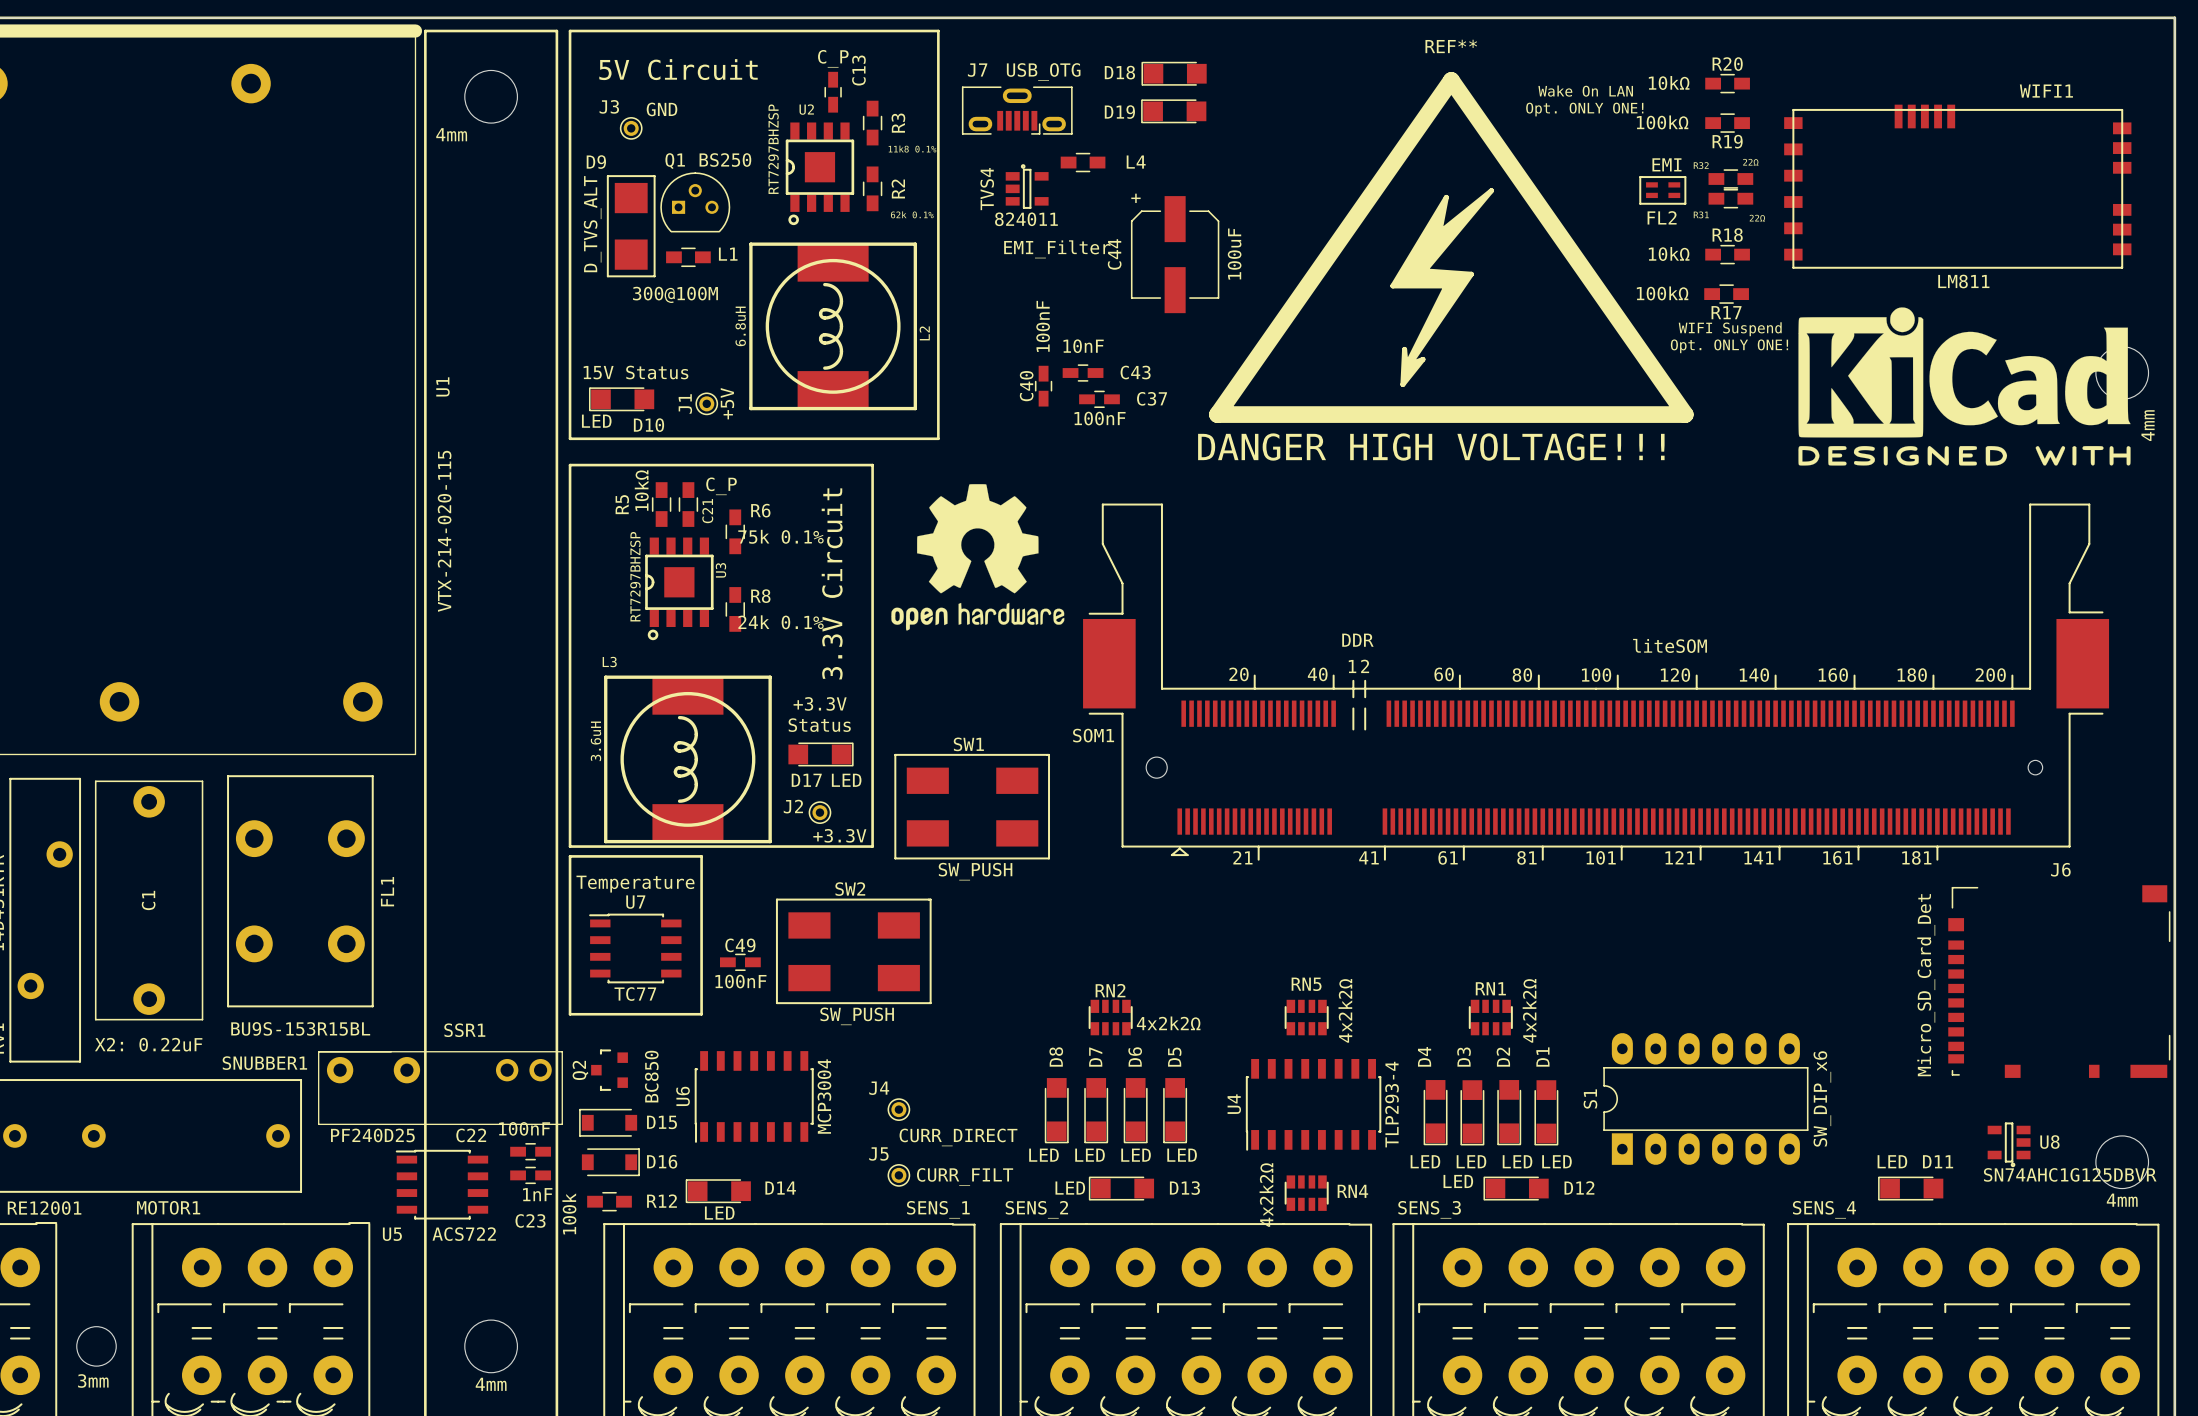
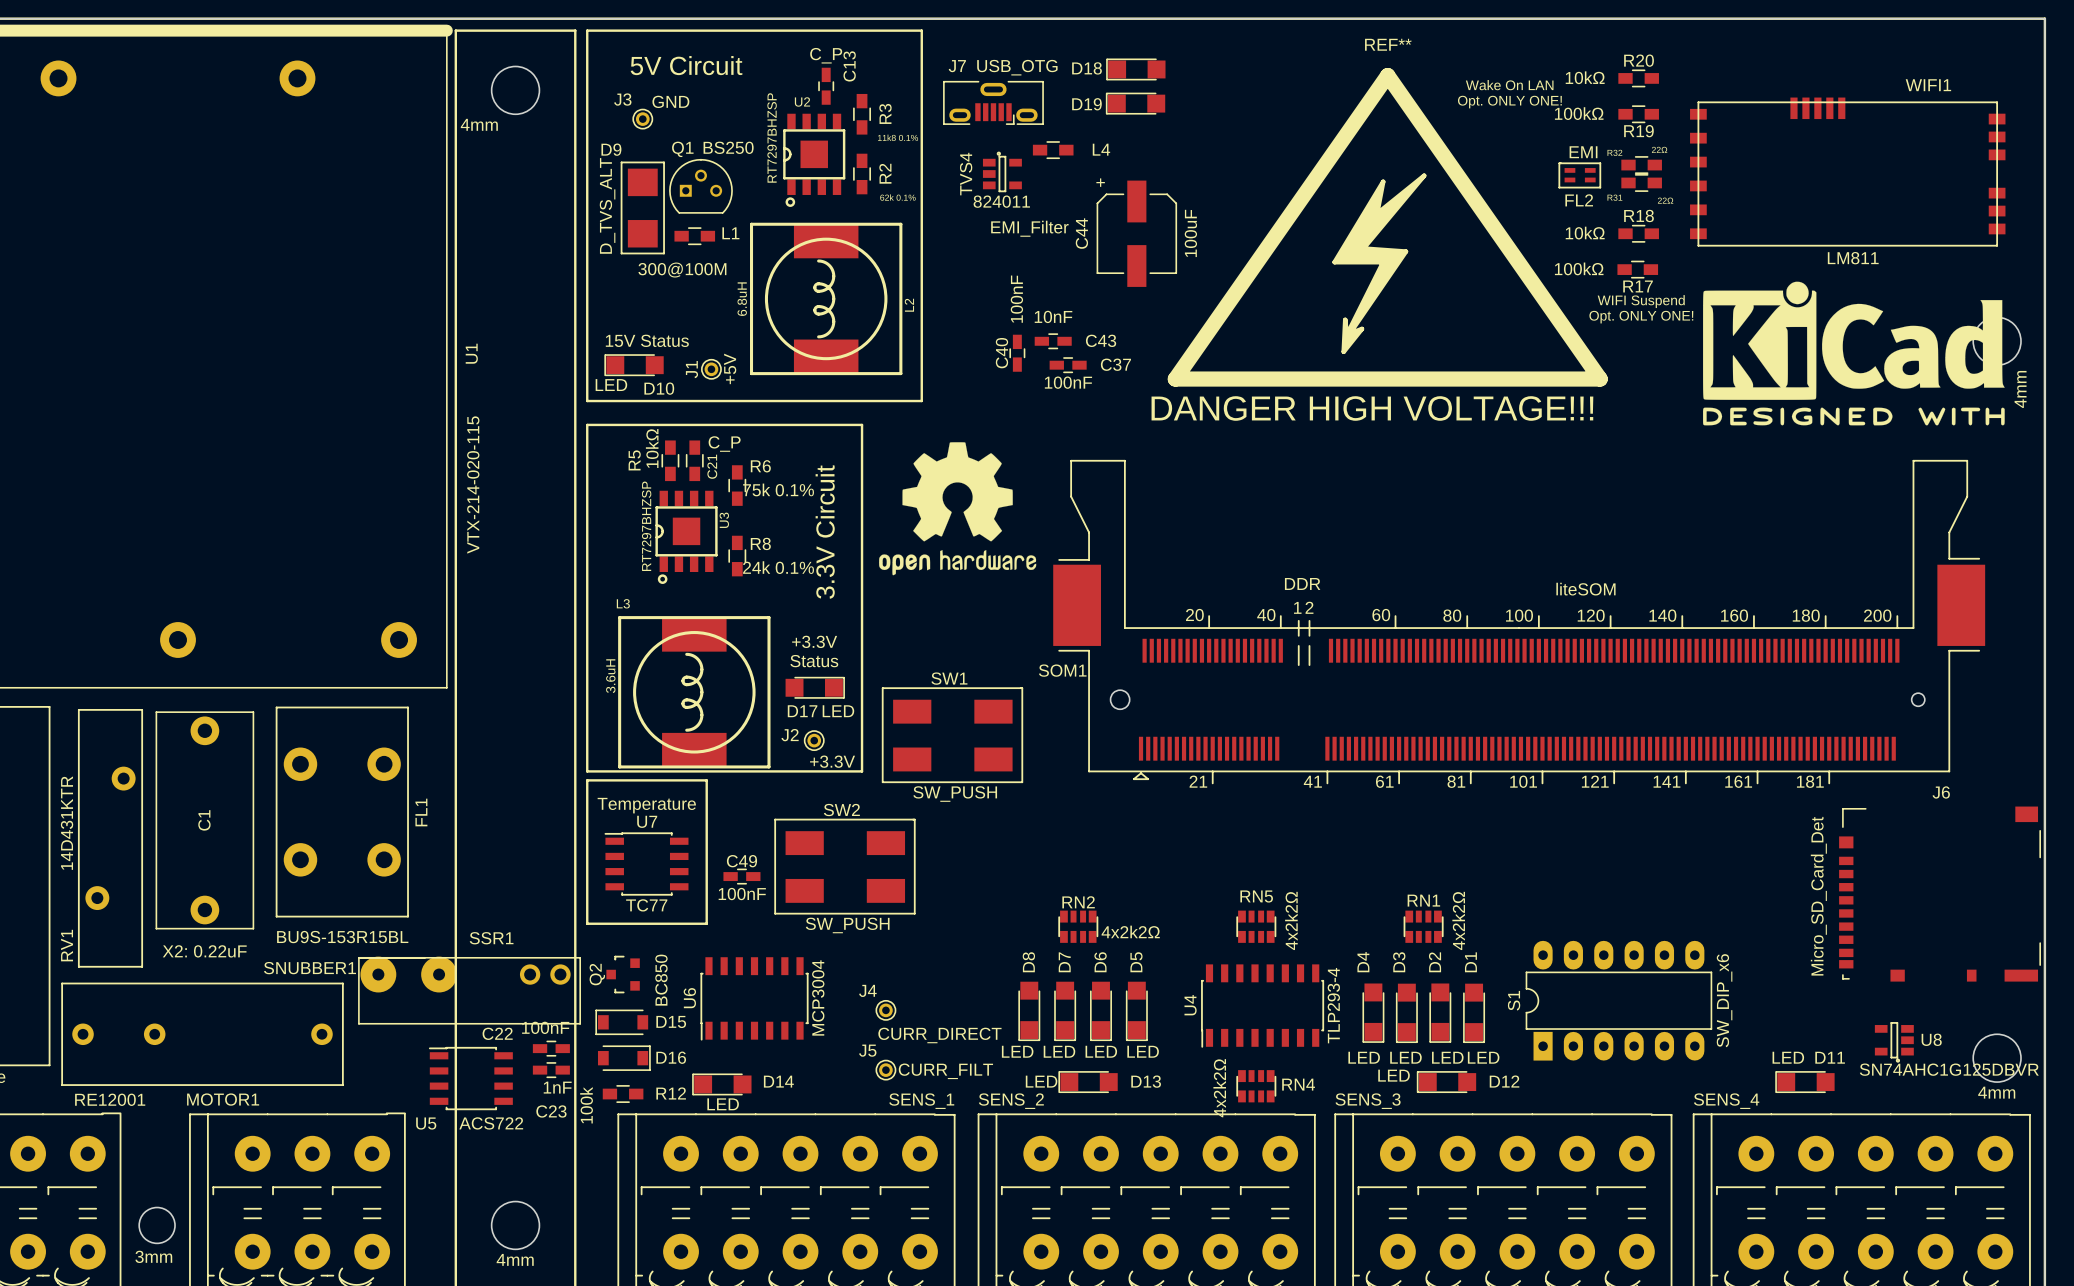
SSR1 footprint: [318, 1051, 563, 1126] -> [358, 956, 581, 1025]
SSR1 value: PF240D25 (372, 1135) -> none

